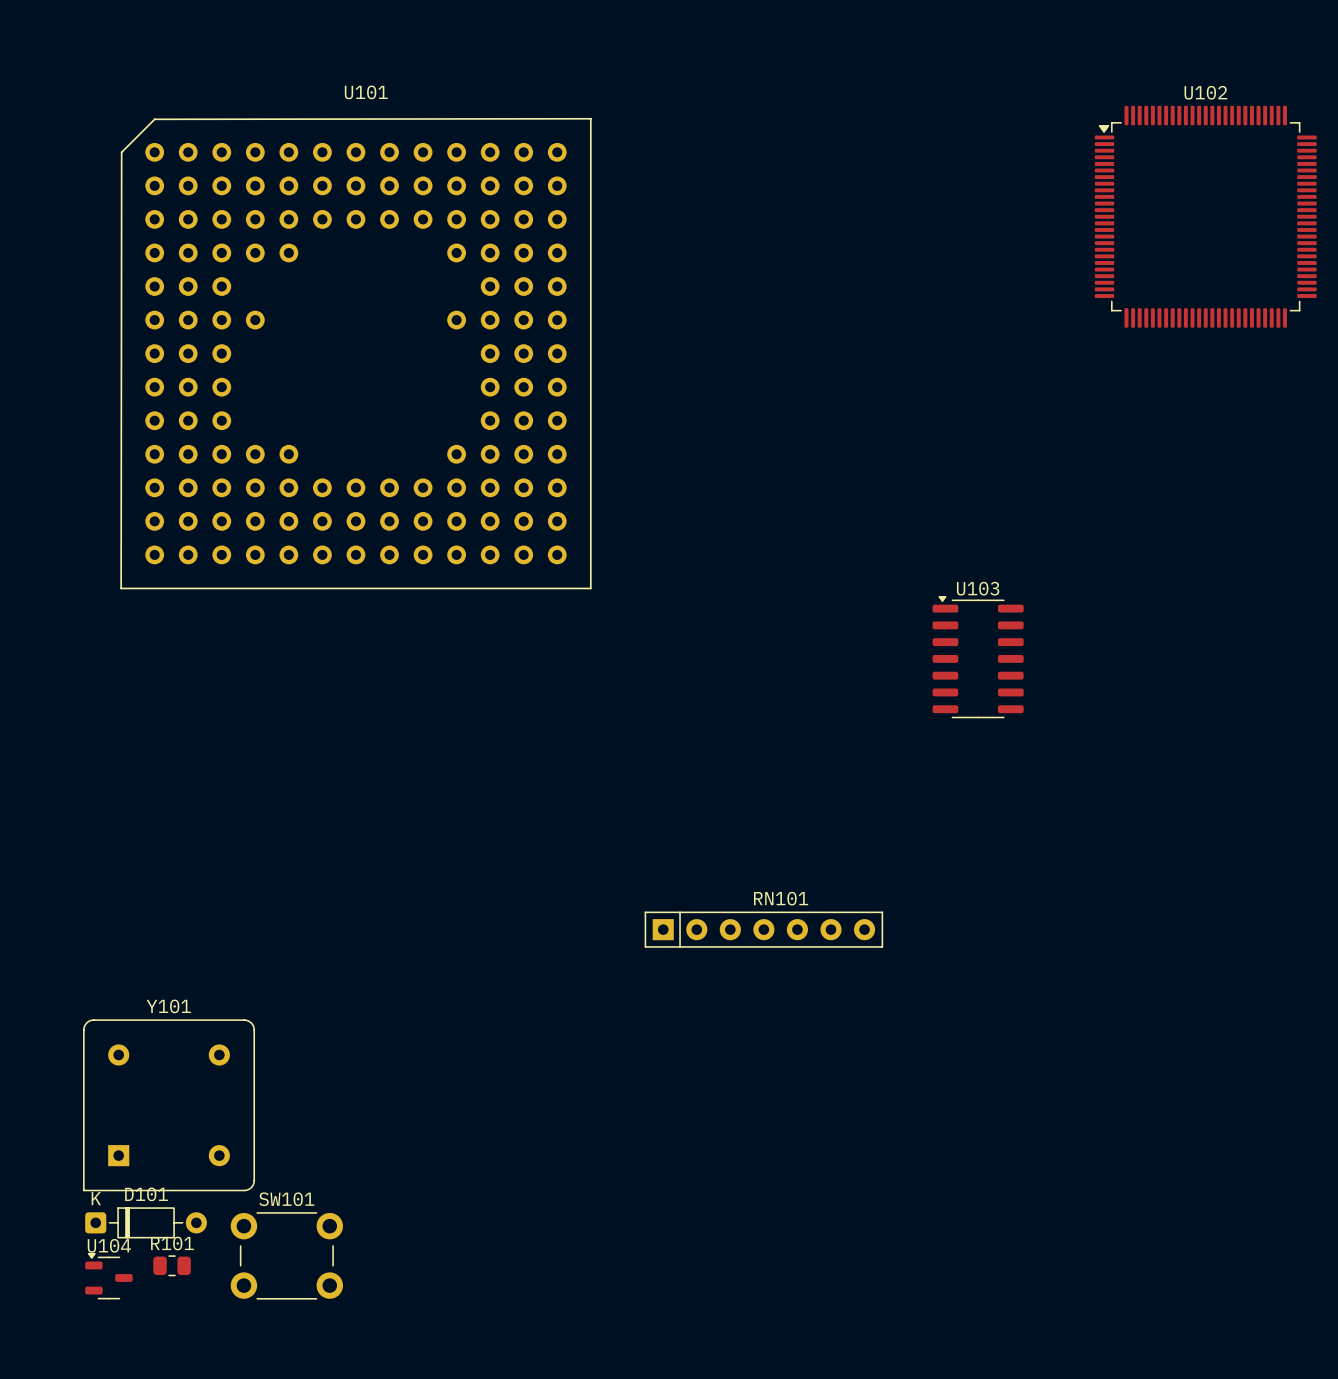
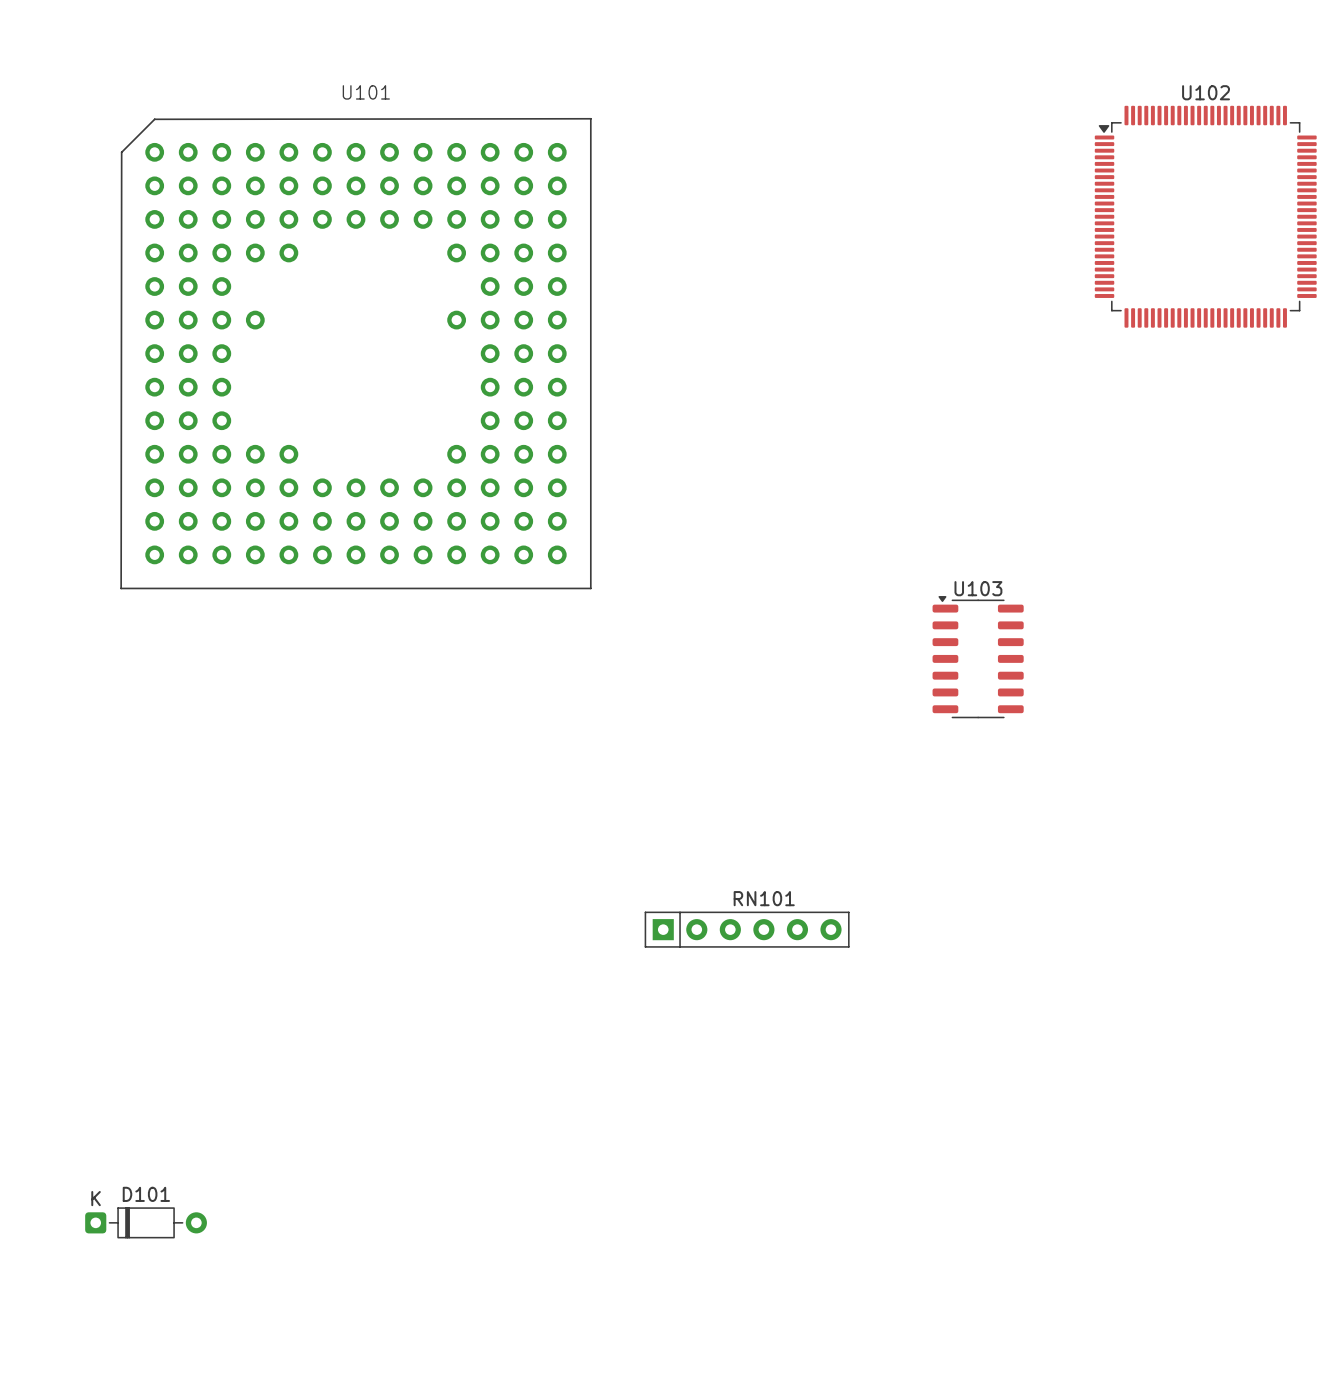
RN101 footprint: [644, 911, 884, 948] -> [644, 911, 850, 948]
Y101: (169, 1105) -> none
SW101: (286, 1255) -> none
R101: (172, 1265) -> none
U104: (108, 1276) -> none

